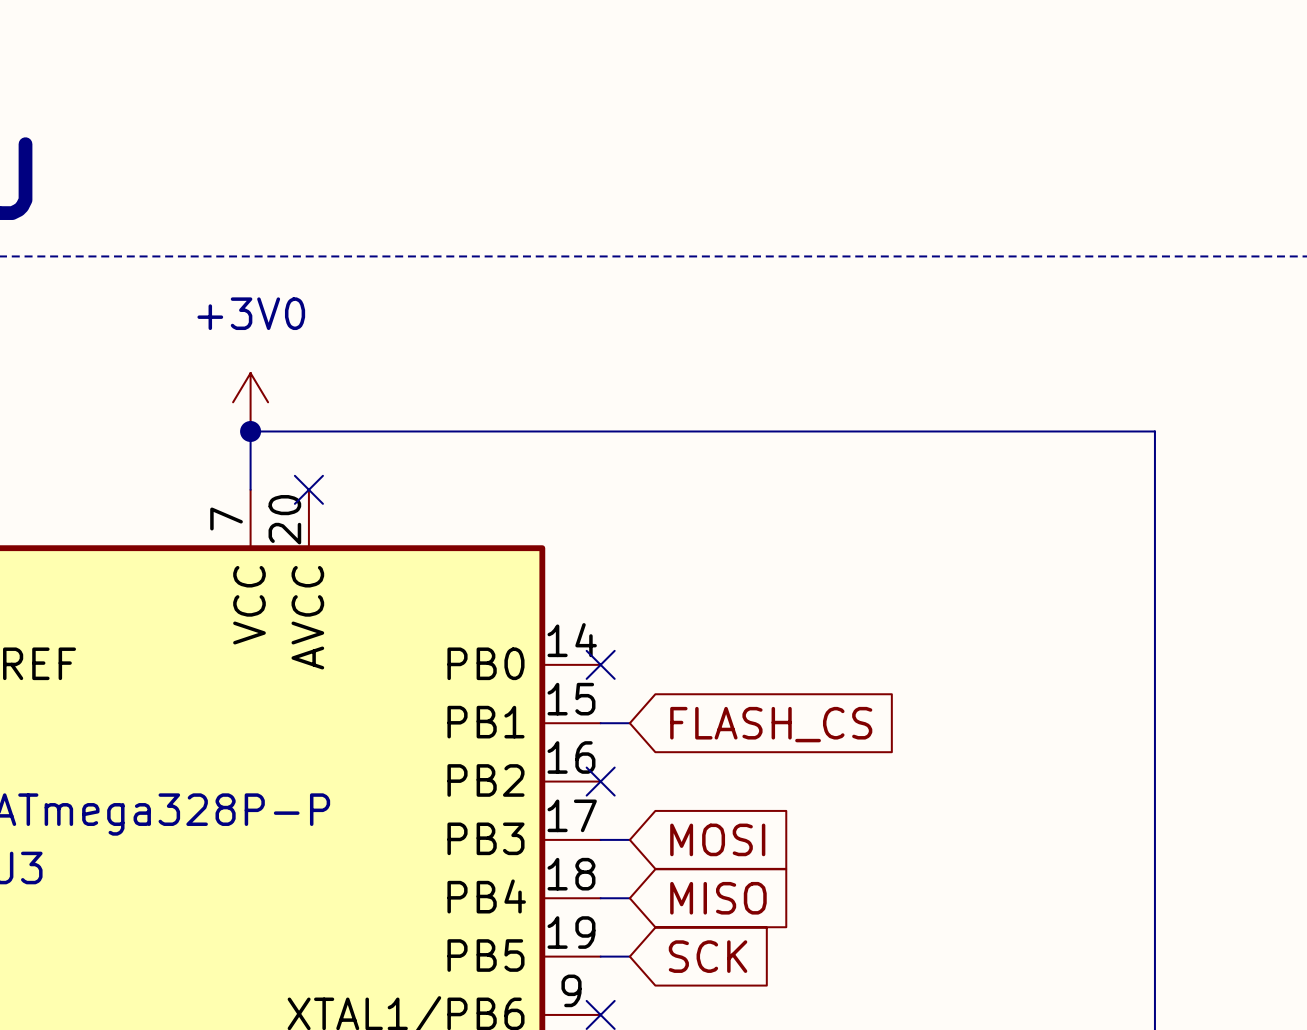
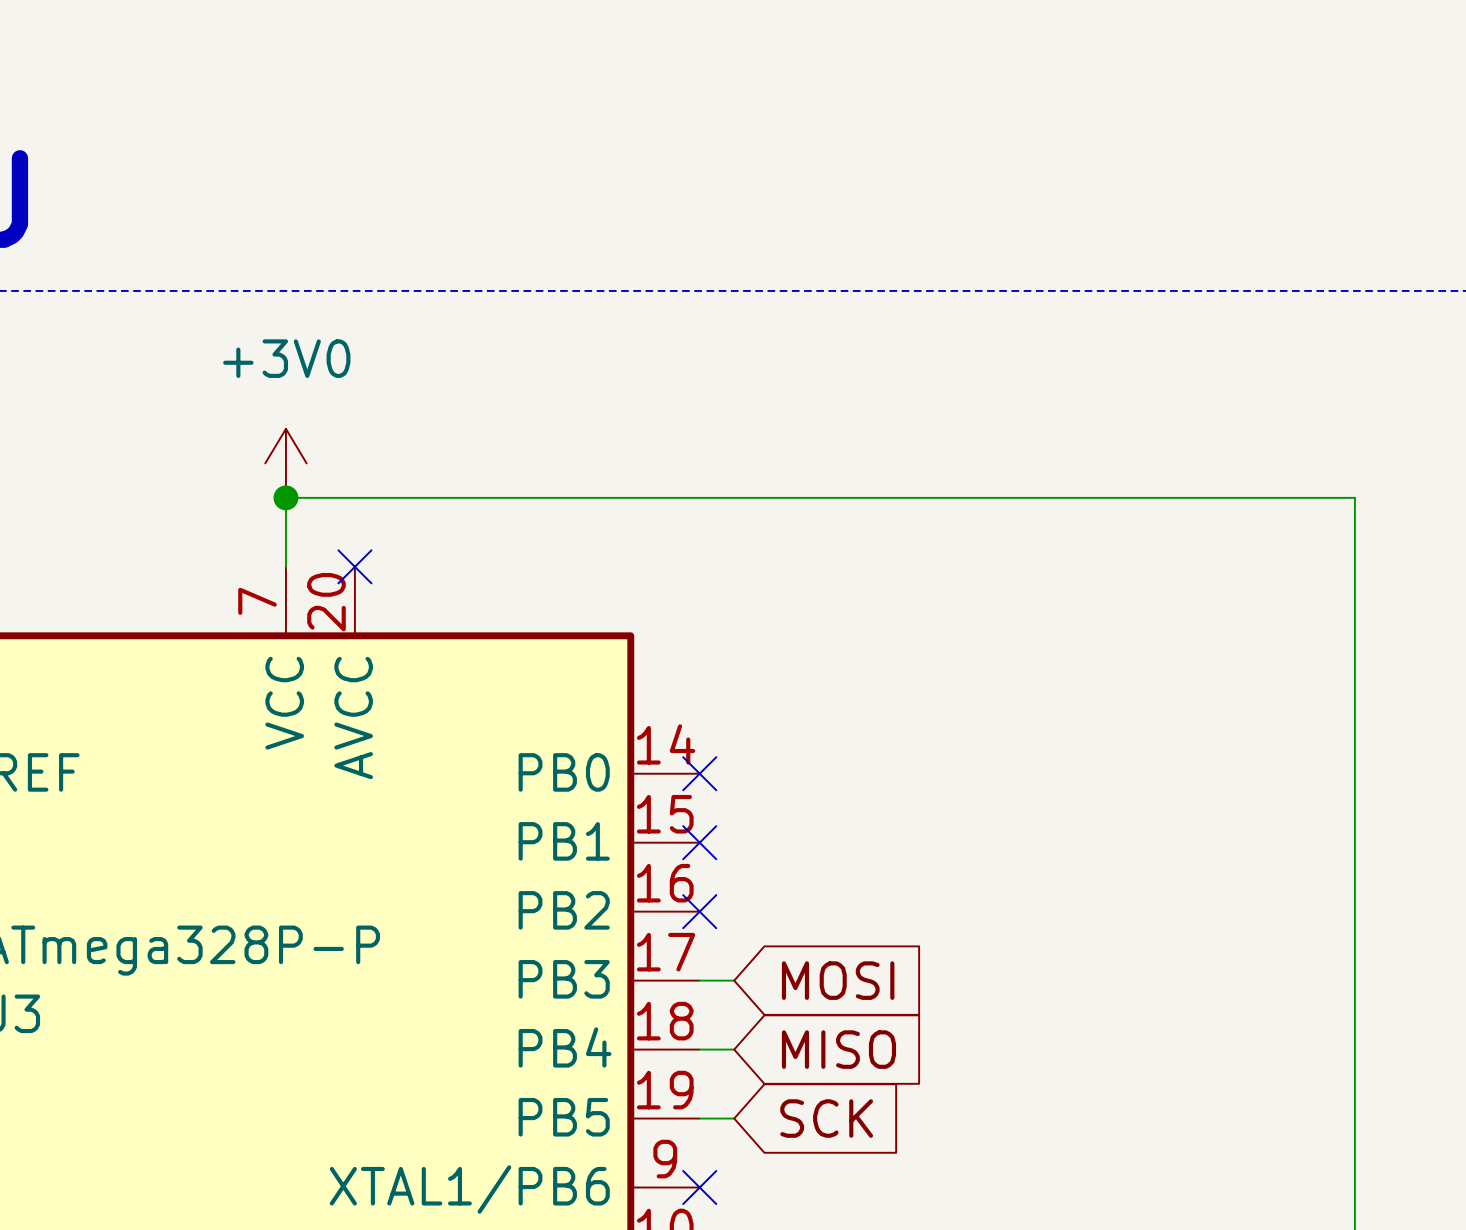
wire: (600, 723) (629, 723) -> none
no-connect mark: none -> (699, 842)
global label: FLASH_CS (771, 724) -> none

